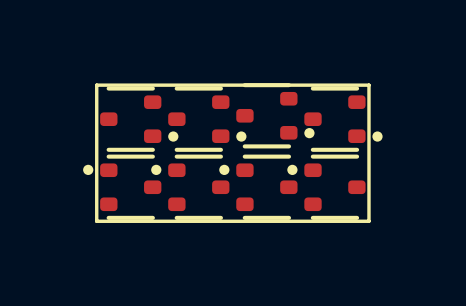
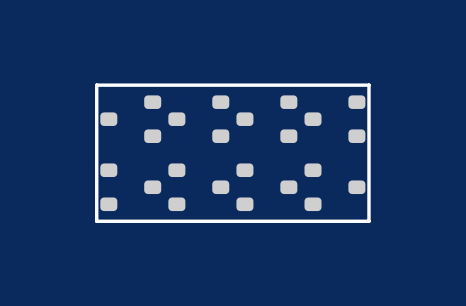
part footprint: [236, 83, 315, 149] -> [236, 95, 298, 143]
part footprint: [100, 86, 179, 152] -> [100, 95, 162, 143]
part footprint: [168, 86, 247, 152] -> [168, 95, 230, 143]
part footprint: [304, 86, 383, 152] -> [304, 95, 366, 143]
part footprint: [83, 154, 162, 220] -> [100, 163, 162, 212]
part footprint: [151, 154, 230, 220] -> [168, 163, 230, 212]
part footprint: [219, 154, 298, 220] -> [236, 163, 298, 212]
part footprint: [287, 154, 366, 220] -> [304, 163, 366, 212]

